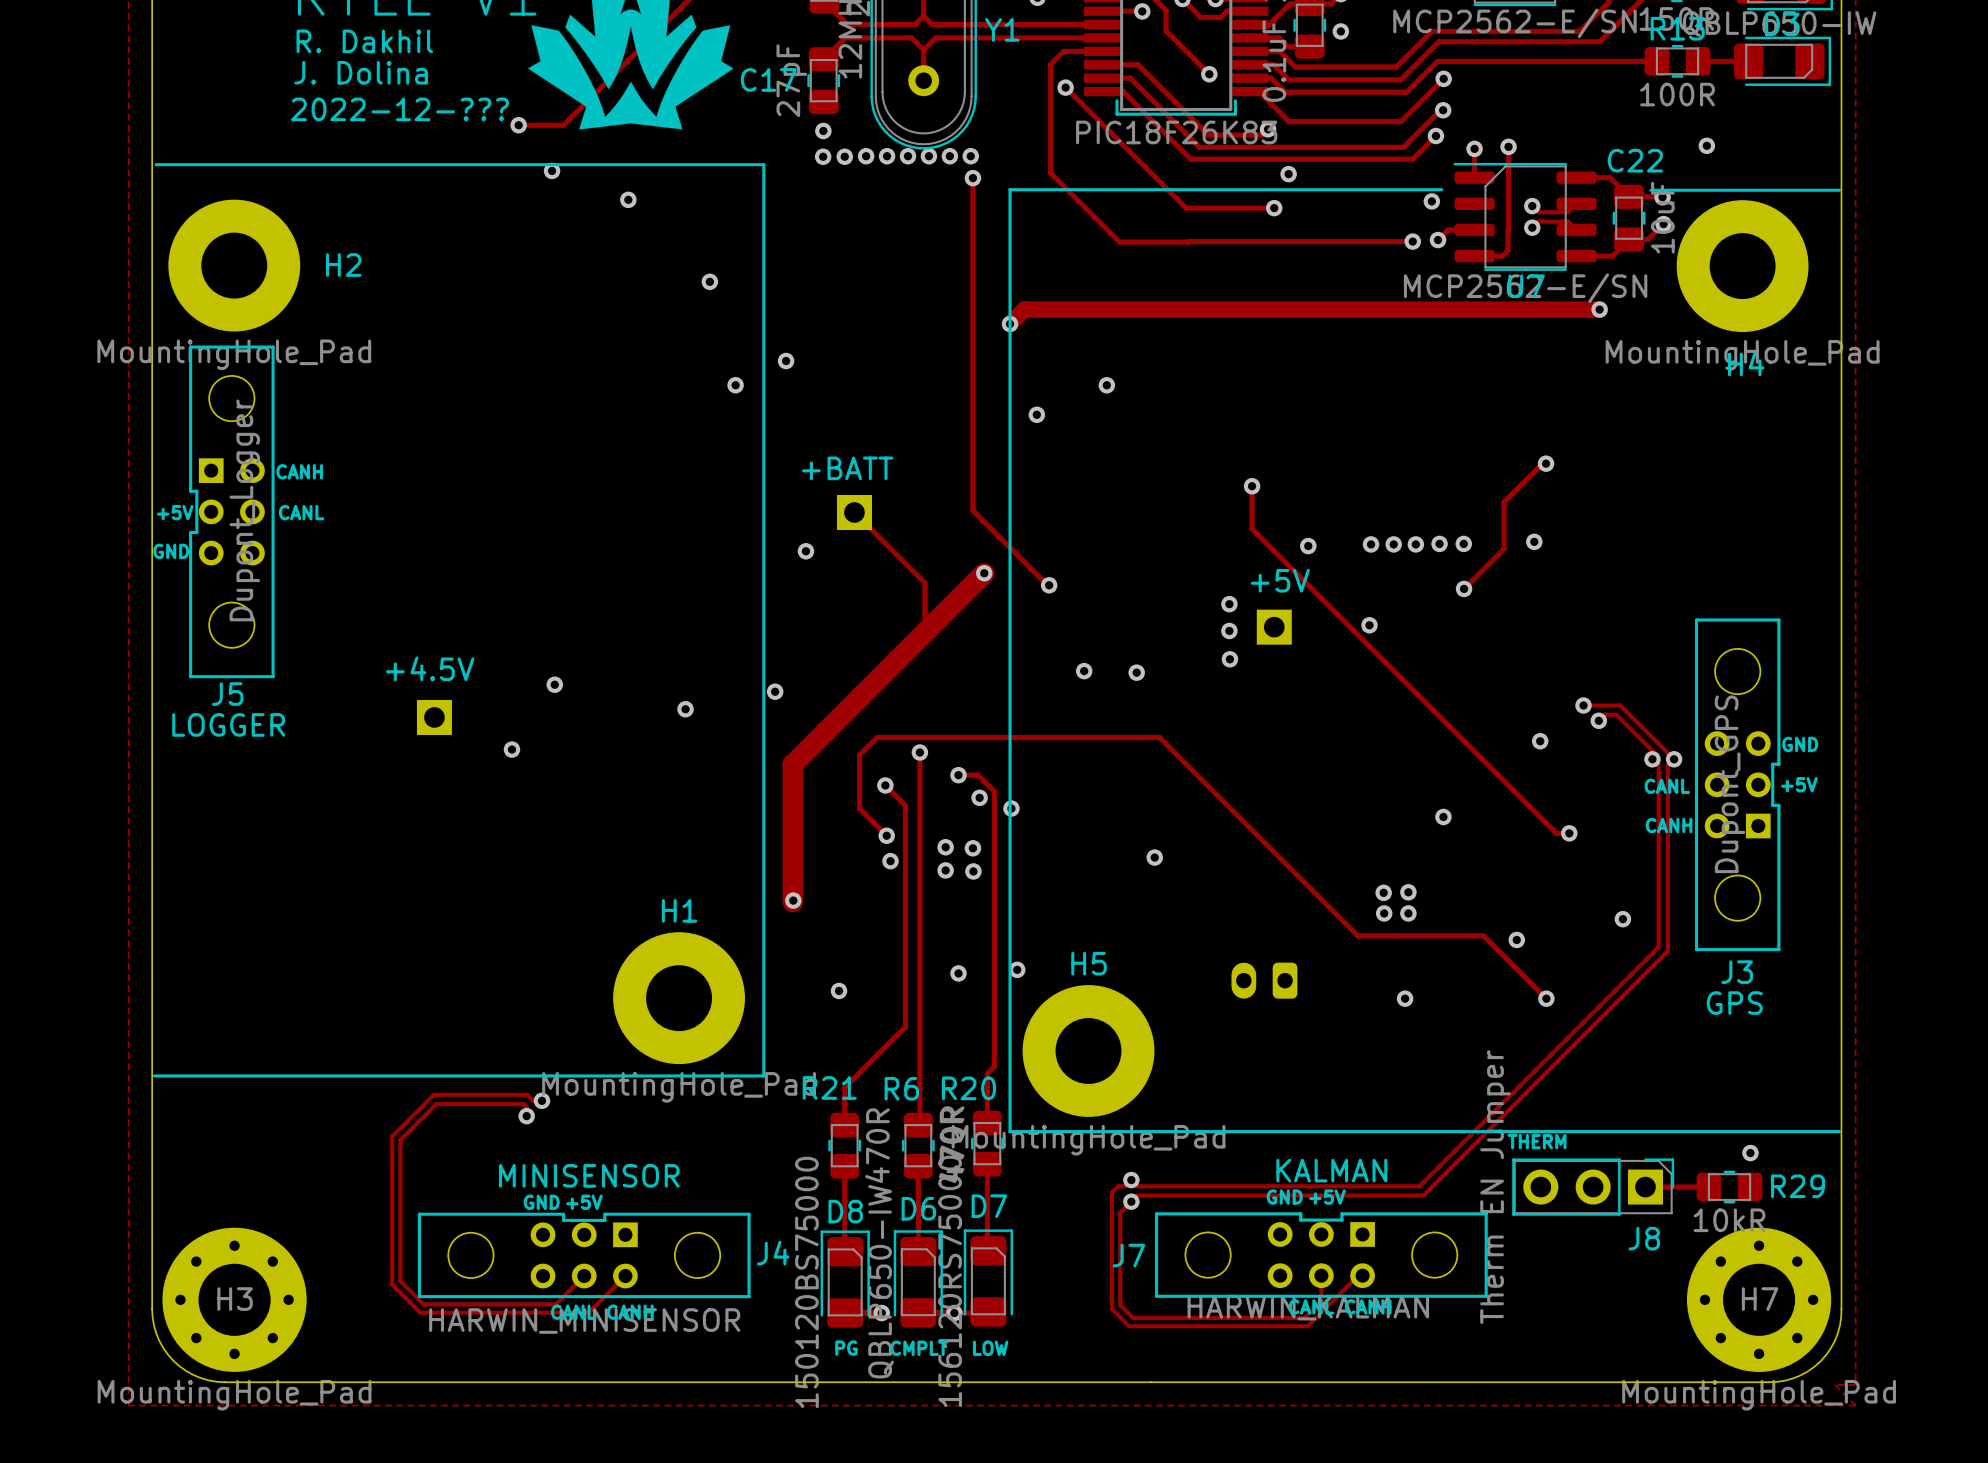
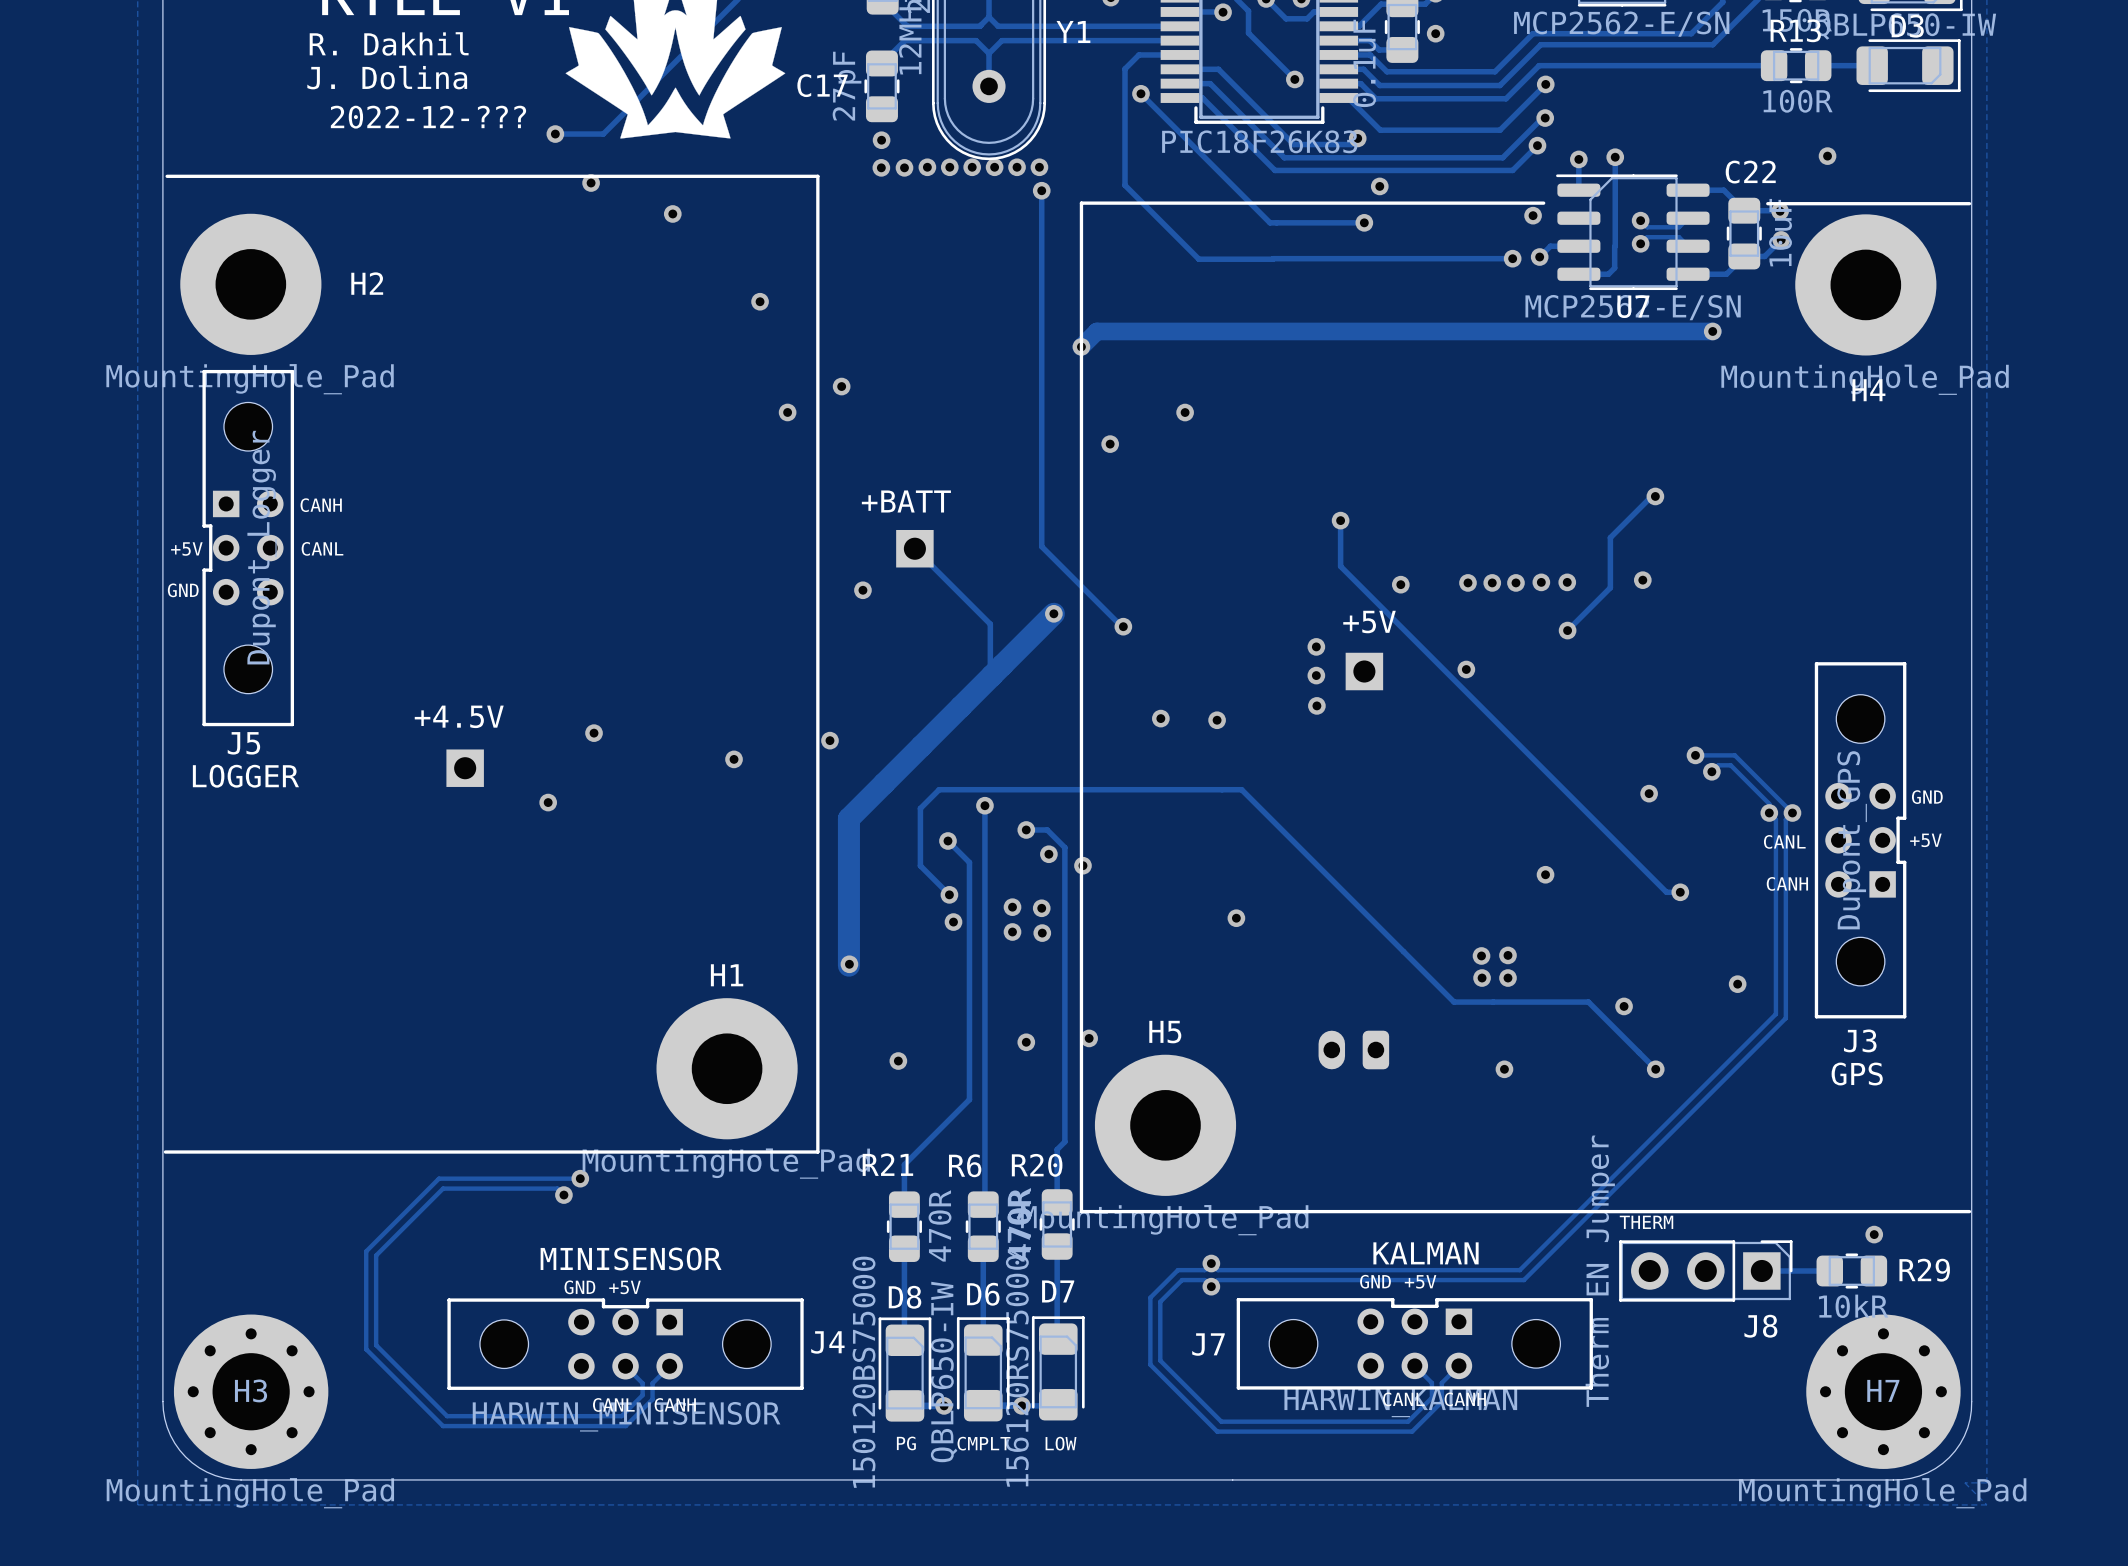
track: (533, 1100) (527, 1094) (433, 1094) (392, 1136) (392, 1284) (420, 1312) (588, 1312) (609, 1291) -> (570, 1178) (438, 1178) (366, 1251) (366, 1349) (443, 1426) (625, 1426) (652, 1399) (652, 1383)
track: (526, 1116) (526, 1107) (523, 1104) (436, 1104) (400, 1139) (400, 1281) (423, 1304) (555, 1304) (584, 1276) -> (563, 1195) (557, 1188) (443, 1188) (376, 1255) (376, 1345) (447, 1416) (621, 1416) (642, 1395) (642, 1383) (625, 1366)
track: (1118, 1186) (1112, 1192) (1112, 1309) (1129, 1326) (1307, 1326) (1358, 1275) (1362, 1275) -> (1197, 1270) (1177, 1270) (1150, 1297) (1150, 1364) (1217, 1431) (1412, 1431) (1441, 1401) (1441, 1382) (1458, 1365)
track: (1131, 1201) (1120, 1212) (1120, 1305) (1133, 1317) (1304, 1317) (1321, 1301) (1321, 1275) -> (1211, 1286) (1204, 1280) (1182, 1280) (1160, 1301) (1160, 1360) (1221, 1421) (1408, 1421) (1431, 1397) (1431, 1382) (1414, 1365)

